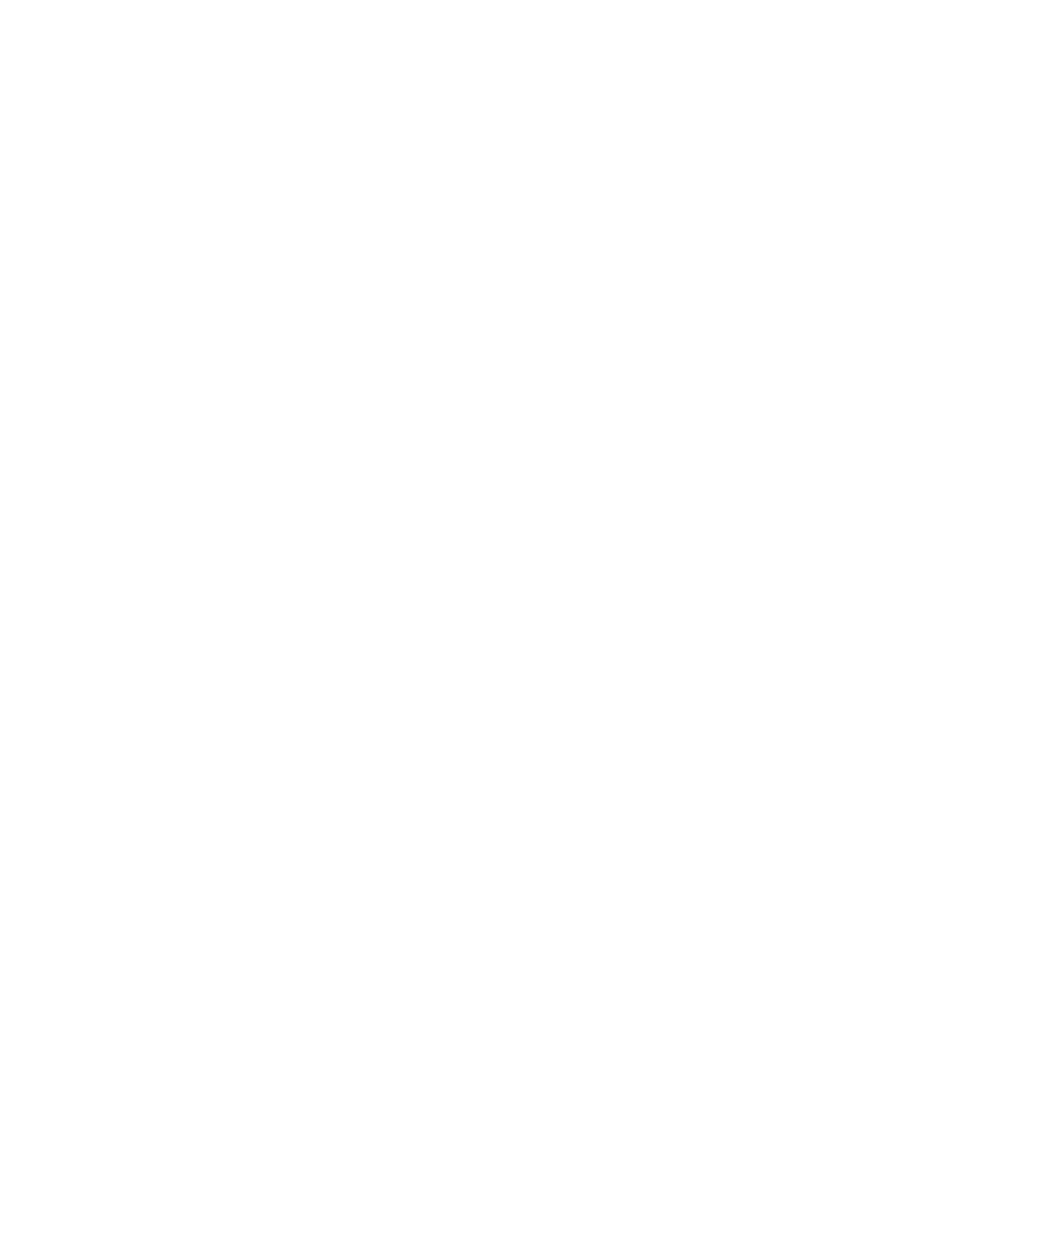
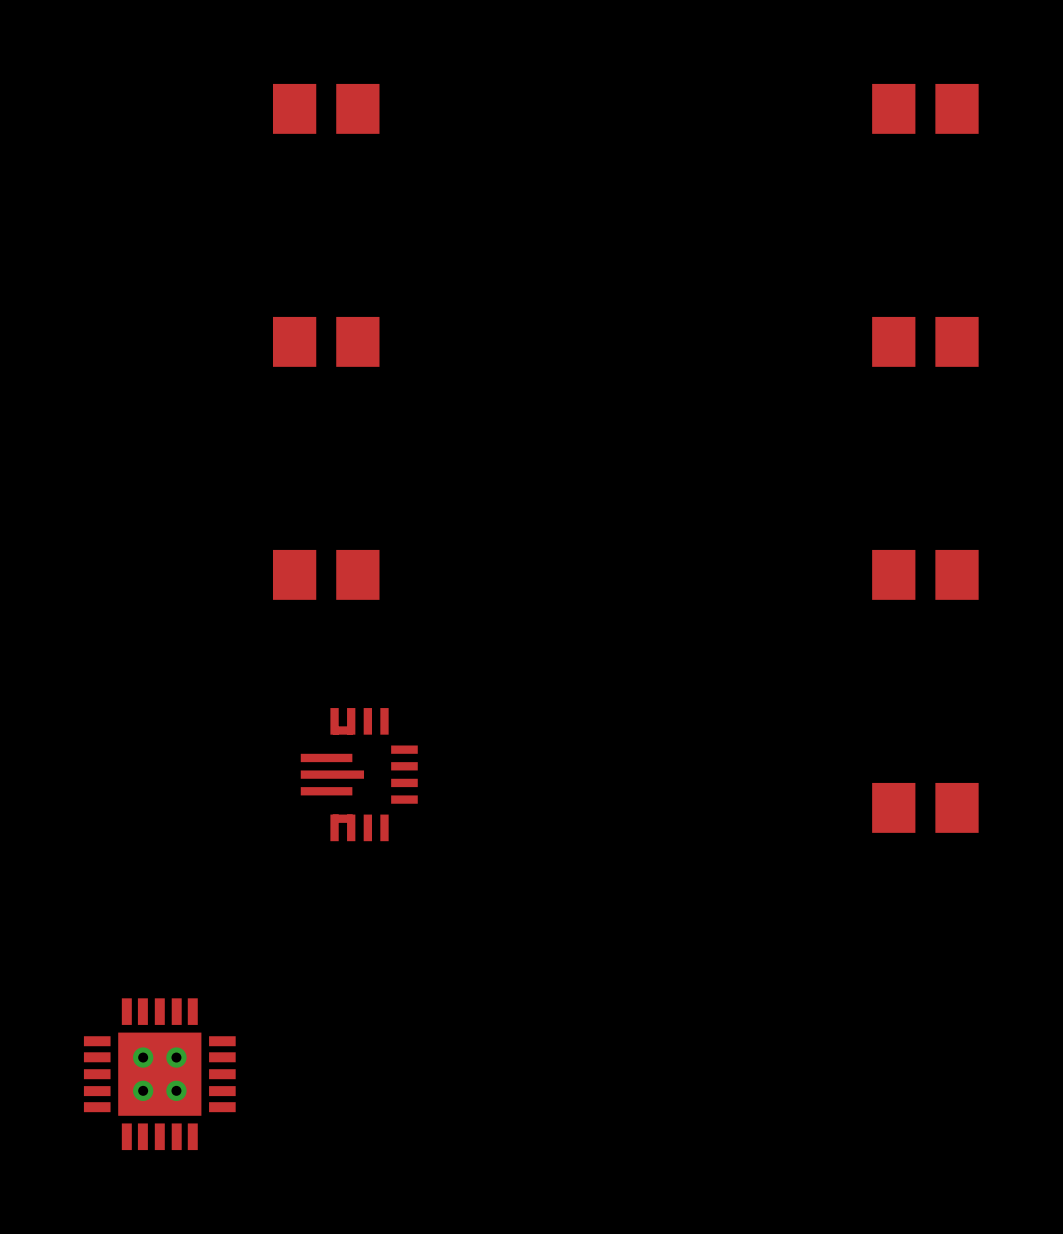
part: none -> (326, 108)
part: none -> (925, 108)
part: none -> (326, 341)
part: none -> (925, 341)
part: none -> (326, 574)
part: none -> (925, 574)
part: none -> (359, 774)
part: none -> (925, 807)
part: none -> (159, 1074)

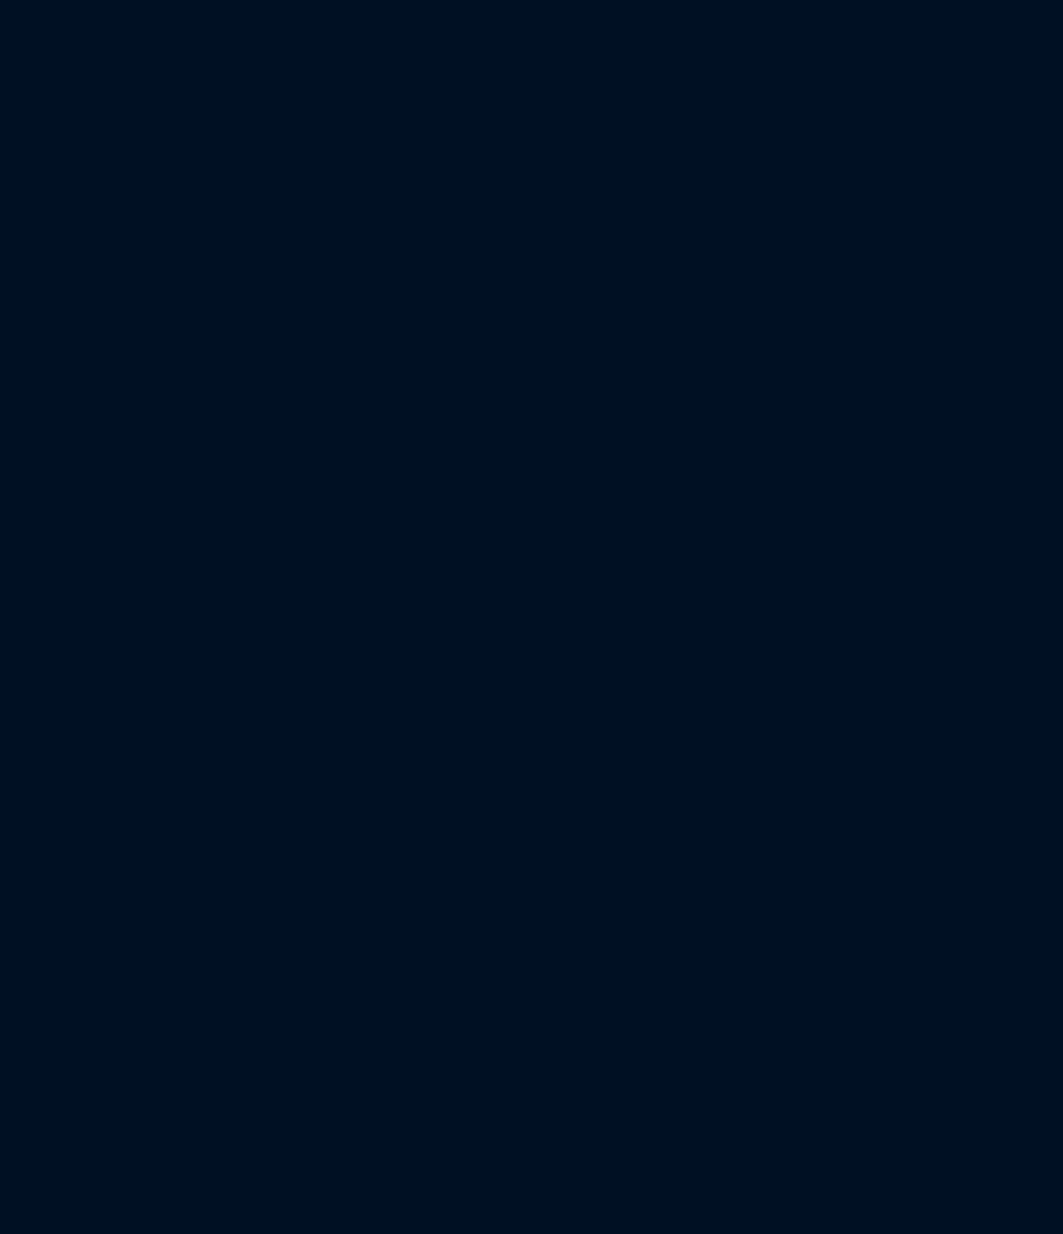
part: (326, 108) -> none
part: (925, 108) -> none
part: (326, 341) -> none
part: (925, 341) -> none
part: (326, 574) -> none
part: (925, 574) -> none
part: (359, 774) -> none
part: (925, 807) -> none
part: (159, 1074) -> none

